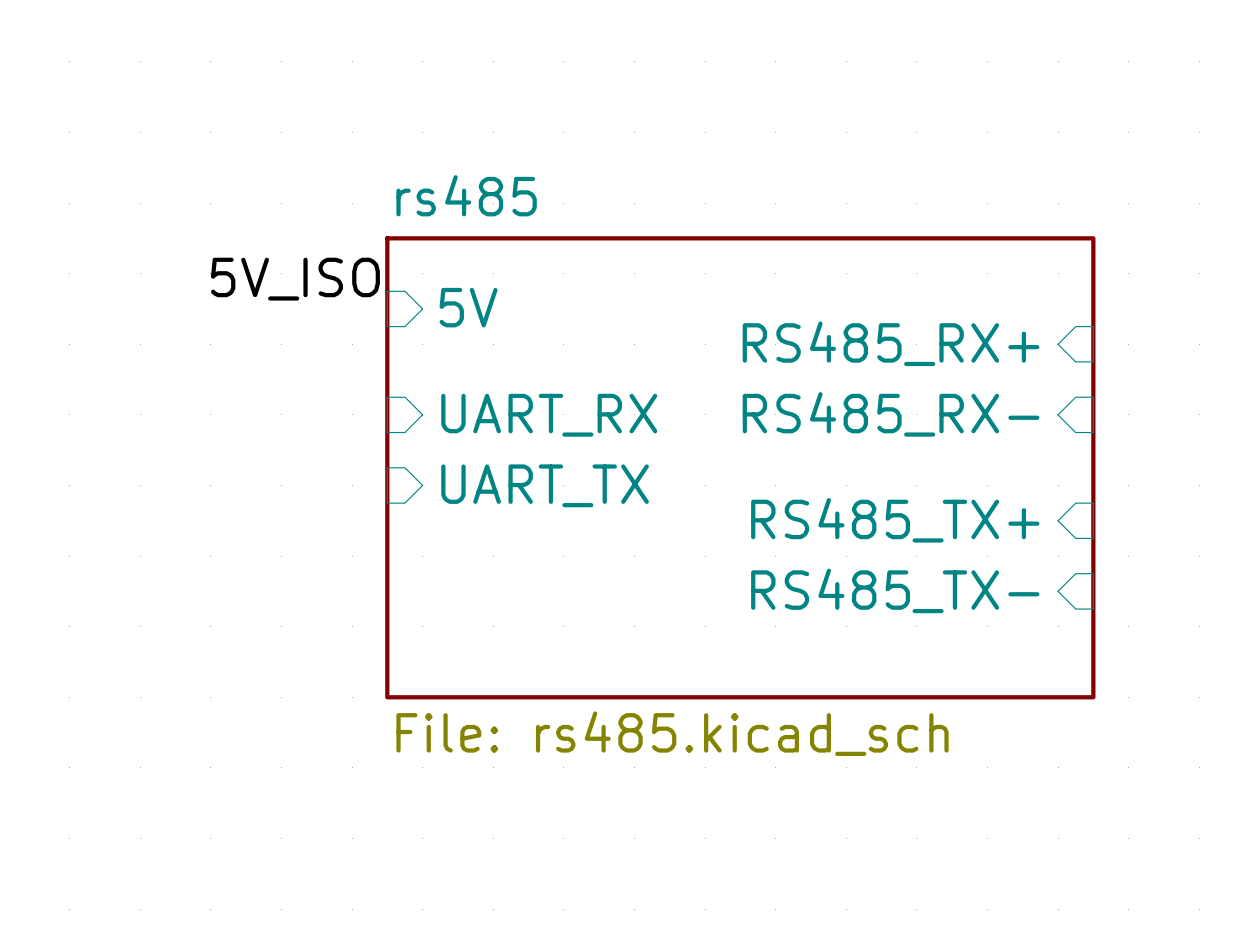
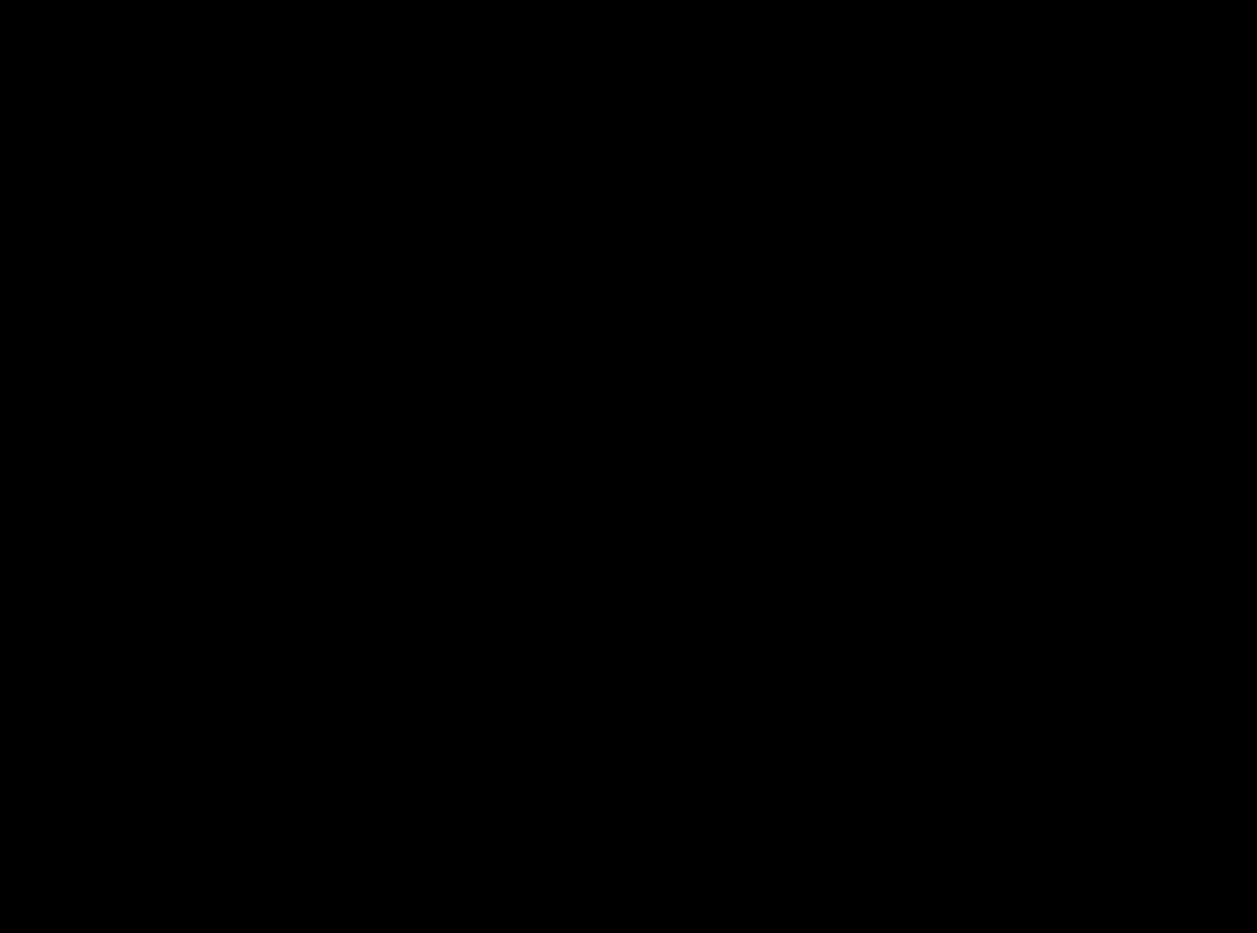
label: 5V_ISO (295, 279) -> none
sheet pin: 5V (468, 307) -> none
sheet pin: RS485_RX+ (891, 343) -> none
sheet pin: RS485_RX- (891, 414) -> none
sheet pin: UART_RX (549, 415) -> none
sheet rs485: File: rs485.kicad_sch (740, 467) -> none
sheet pin: UART_TX (545, 485) -> none
sheet pin: RS485_TX+ (895, 520) -> none
sheet pin: RS485_TX- (895, 590) -> none

